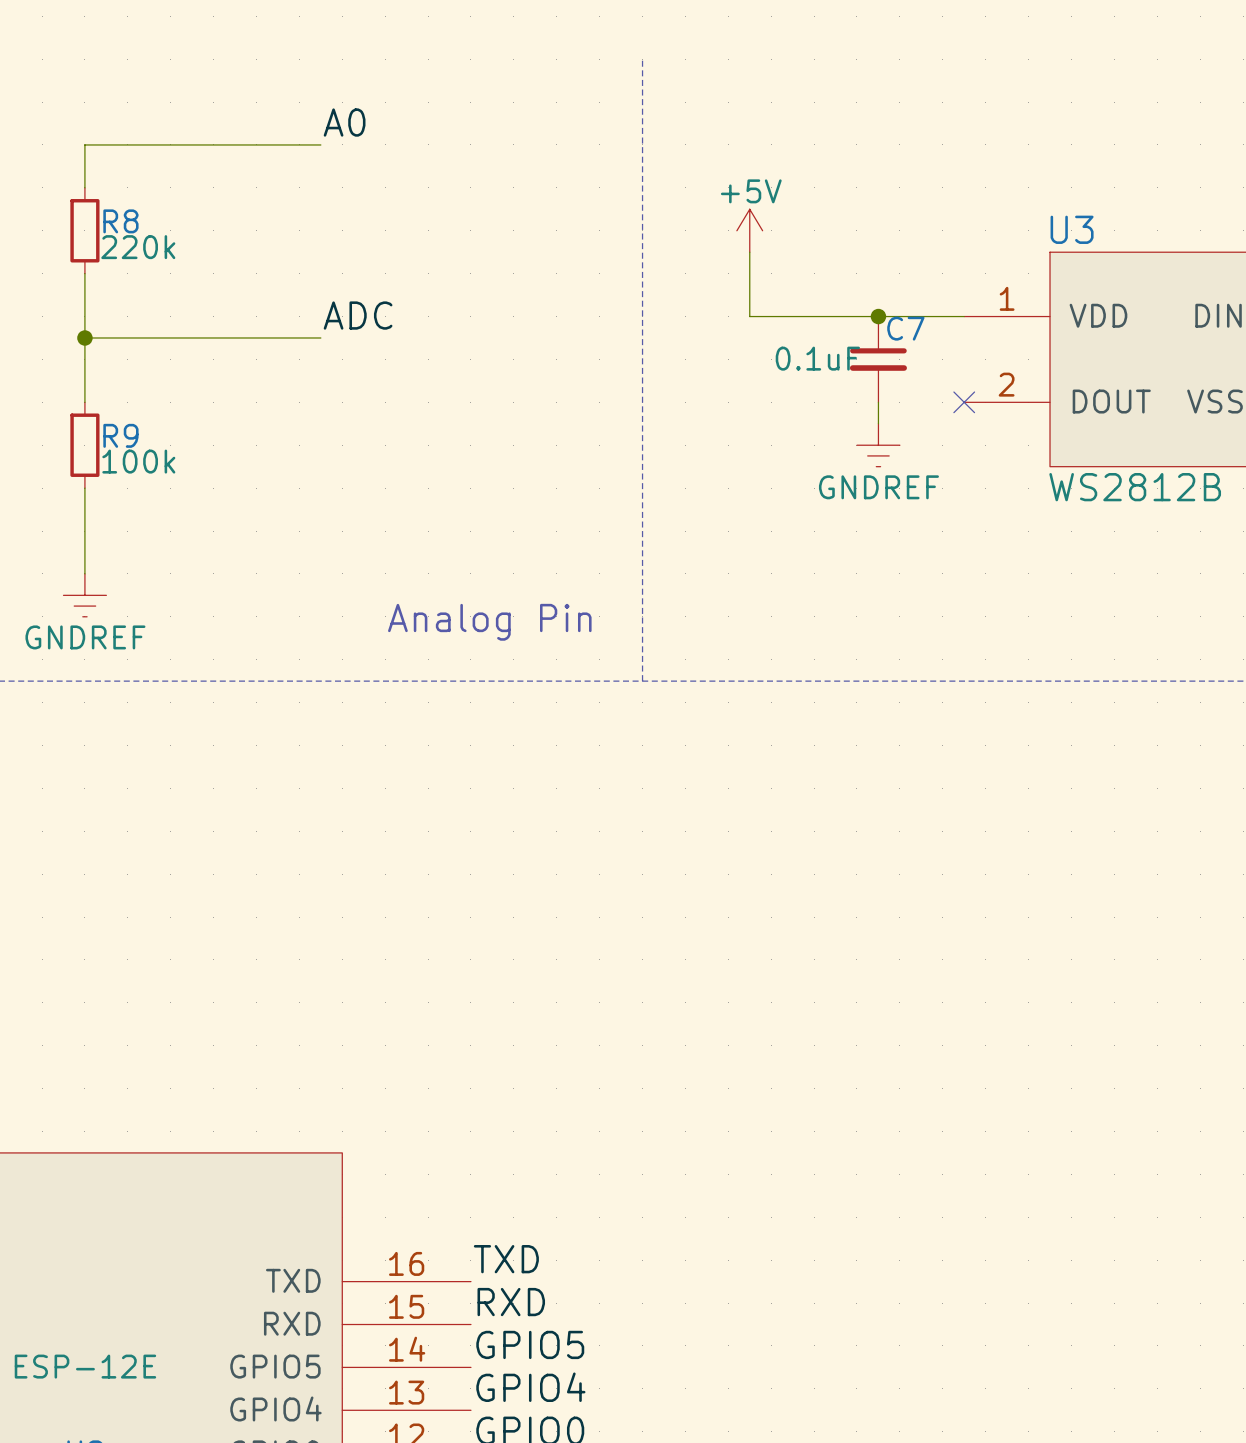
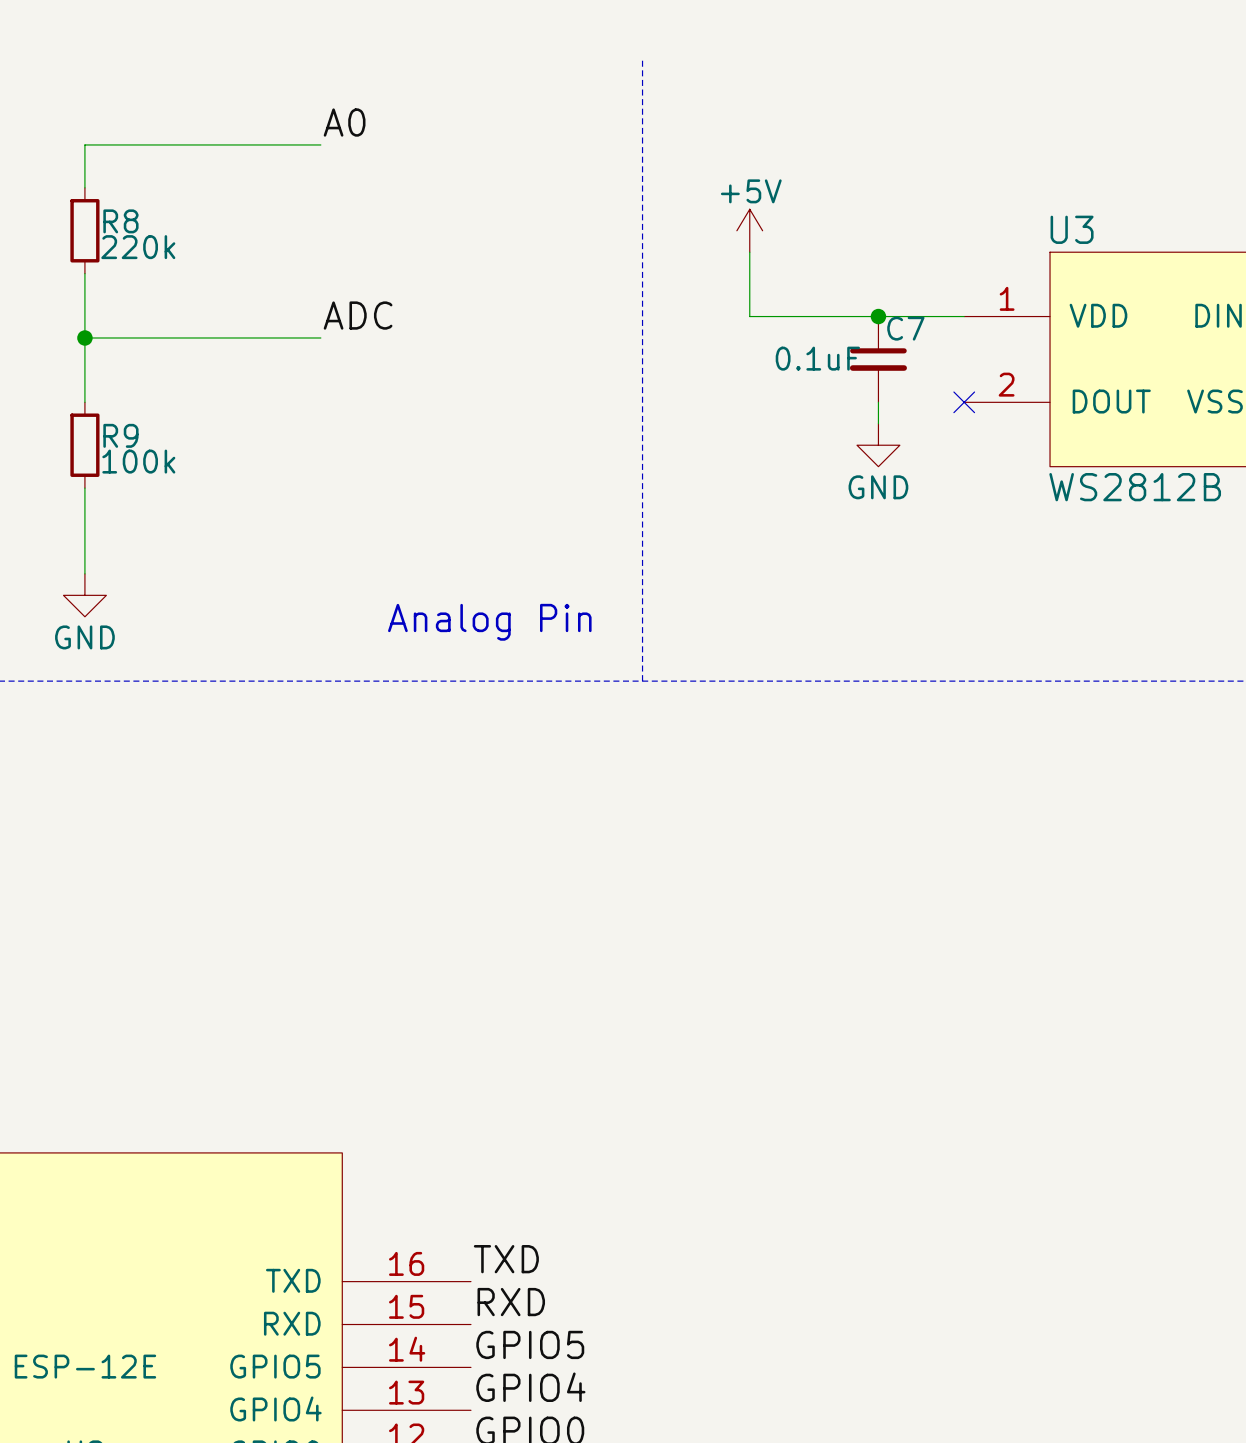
power symbol: GNDREF (878, 445) -> GND (878, 445)
power symbol: GNDREF (84, 595) -> GND (84, 595)

